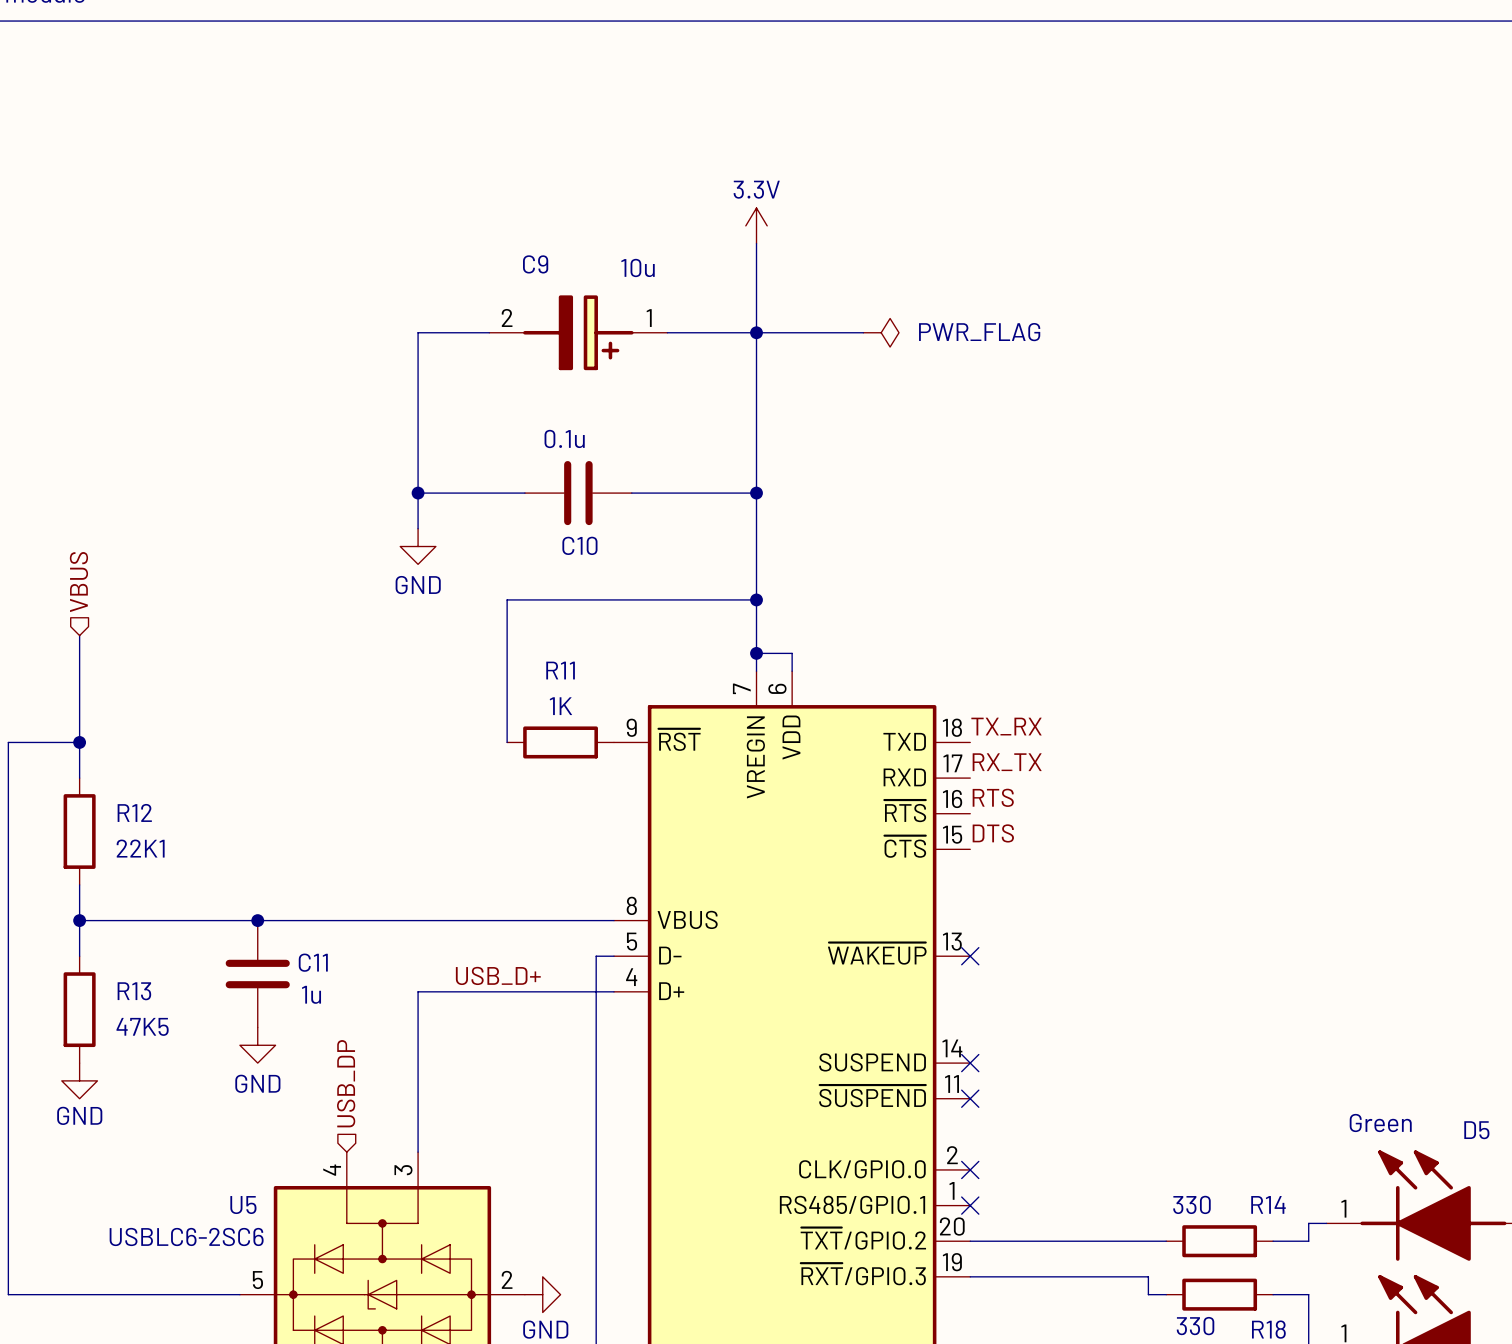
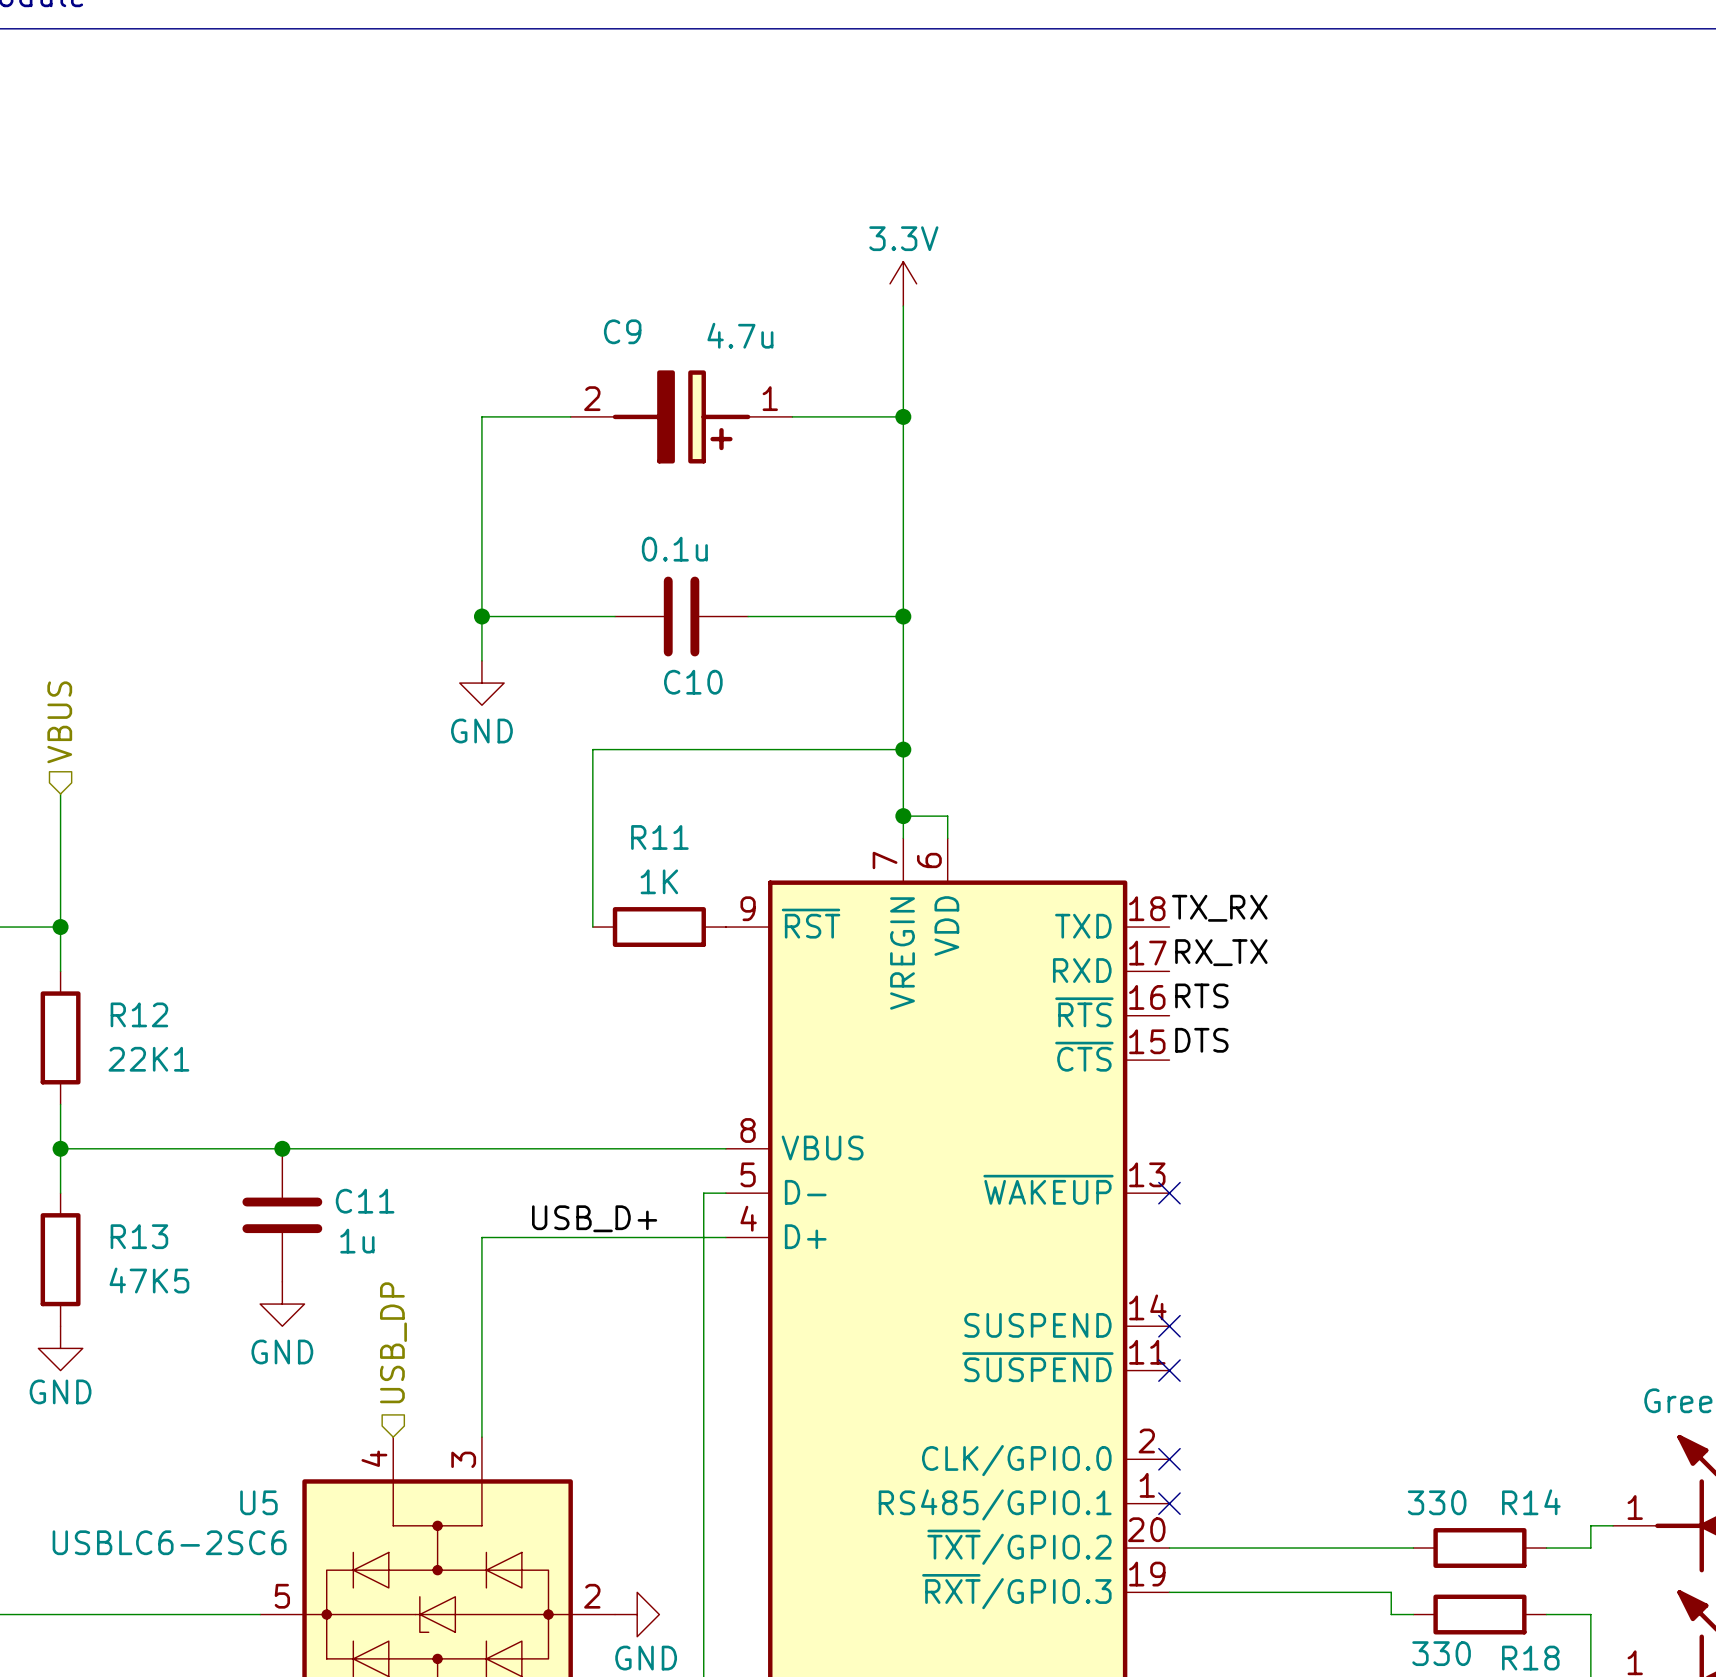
C9 value: 10u (638, 267) -> 4.7u (740, 335)
wire: (756, 332) (863, 332) -> none
power symbol: PWR_FLAG (881, 332) -> none

